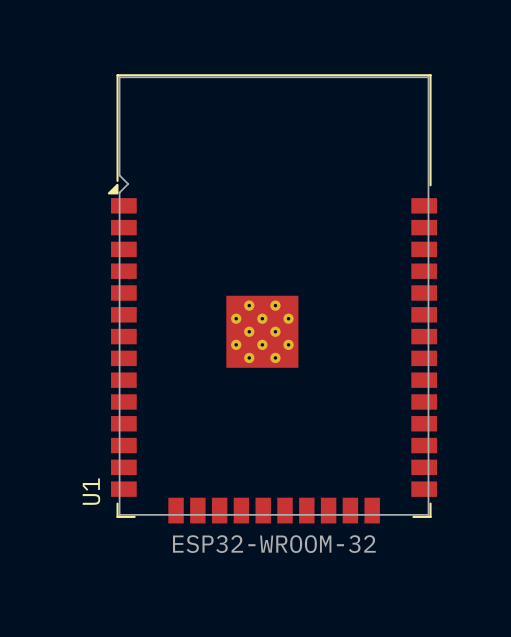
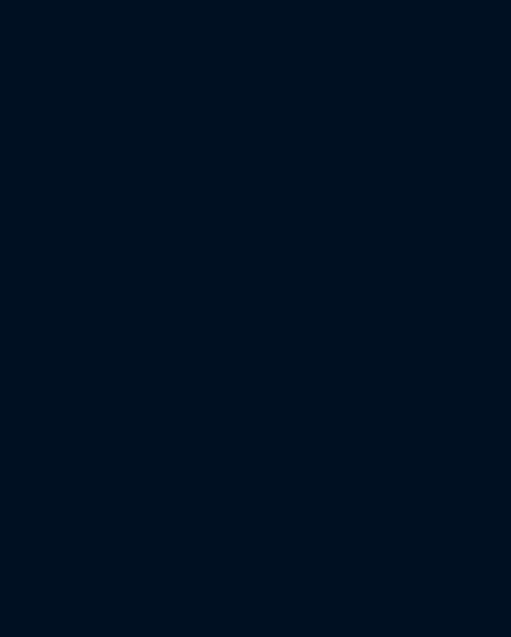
U1: ESP32-WROOM-32 (272, 298) -> none

